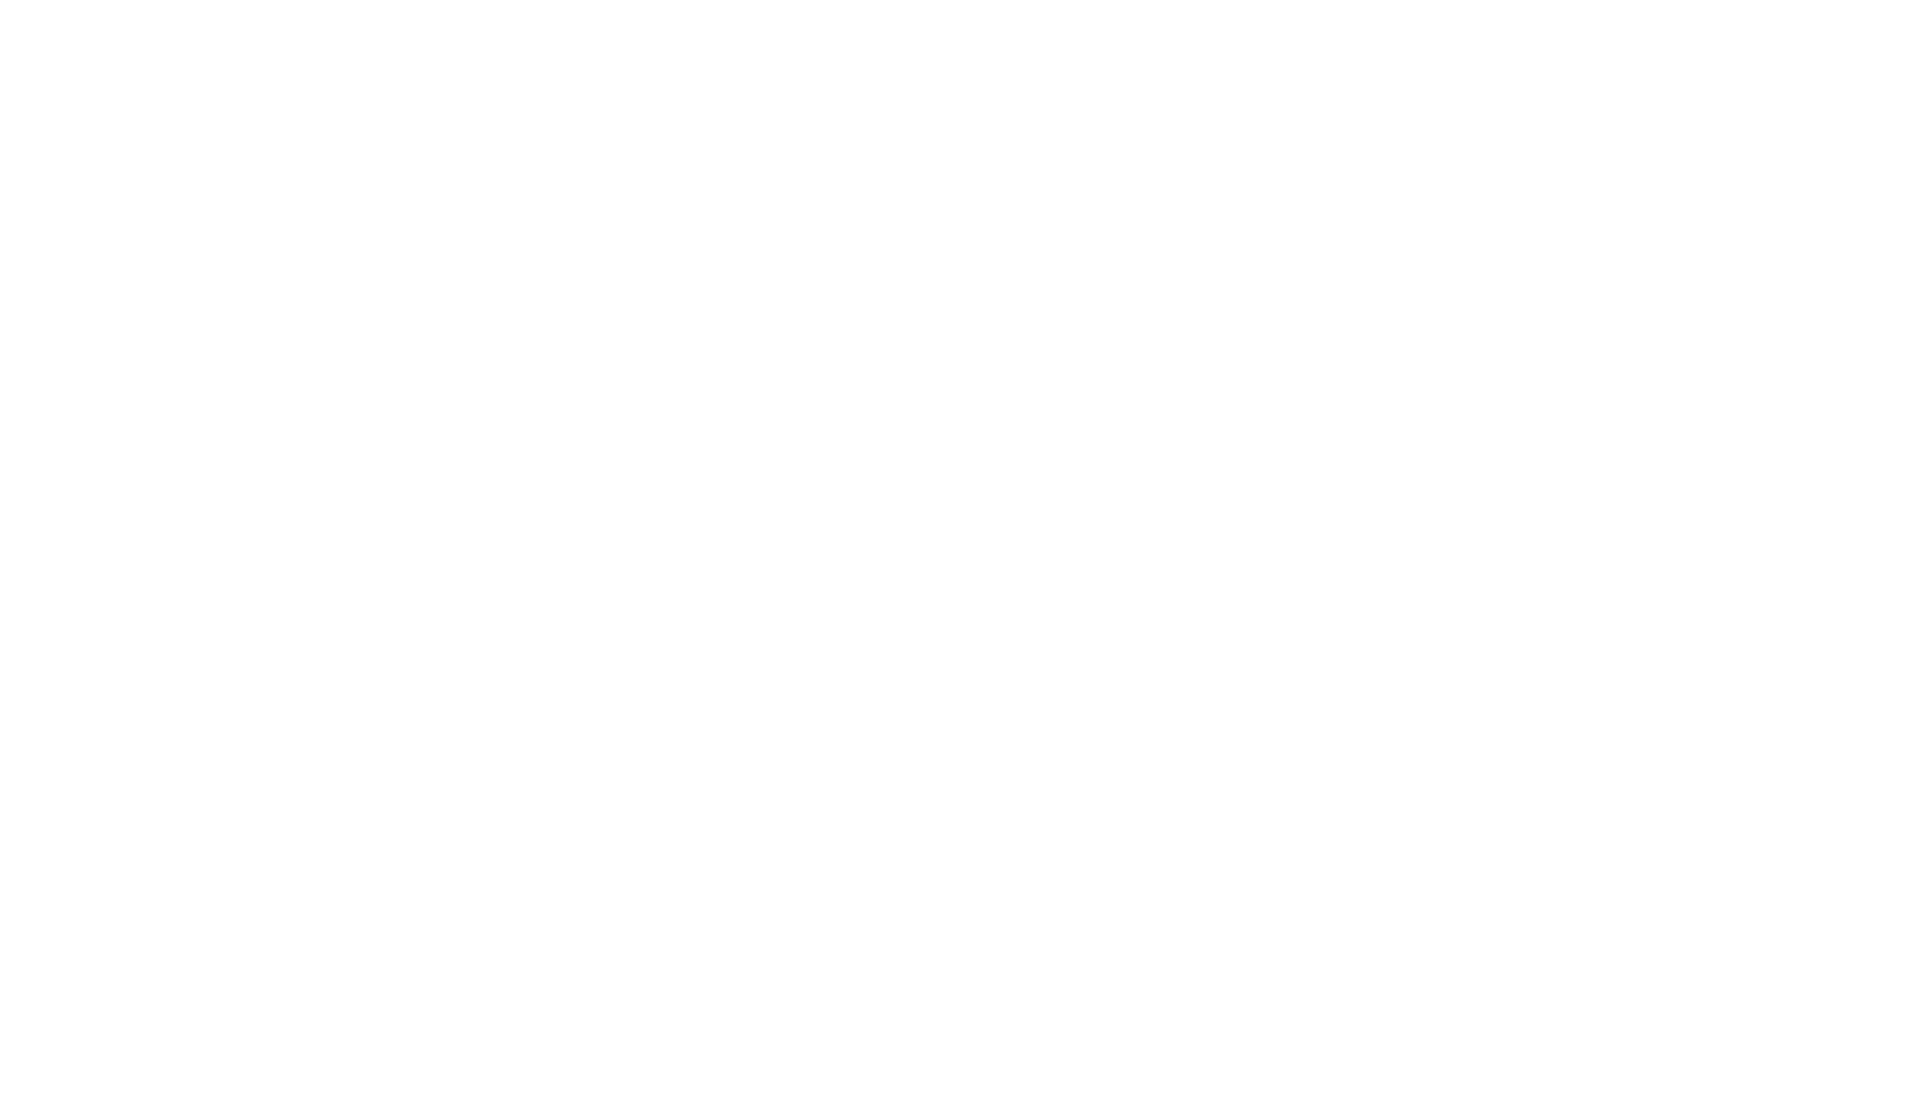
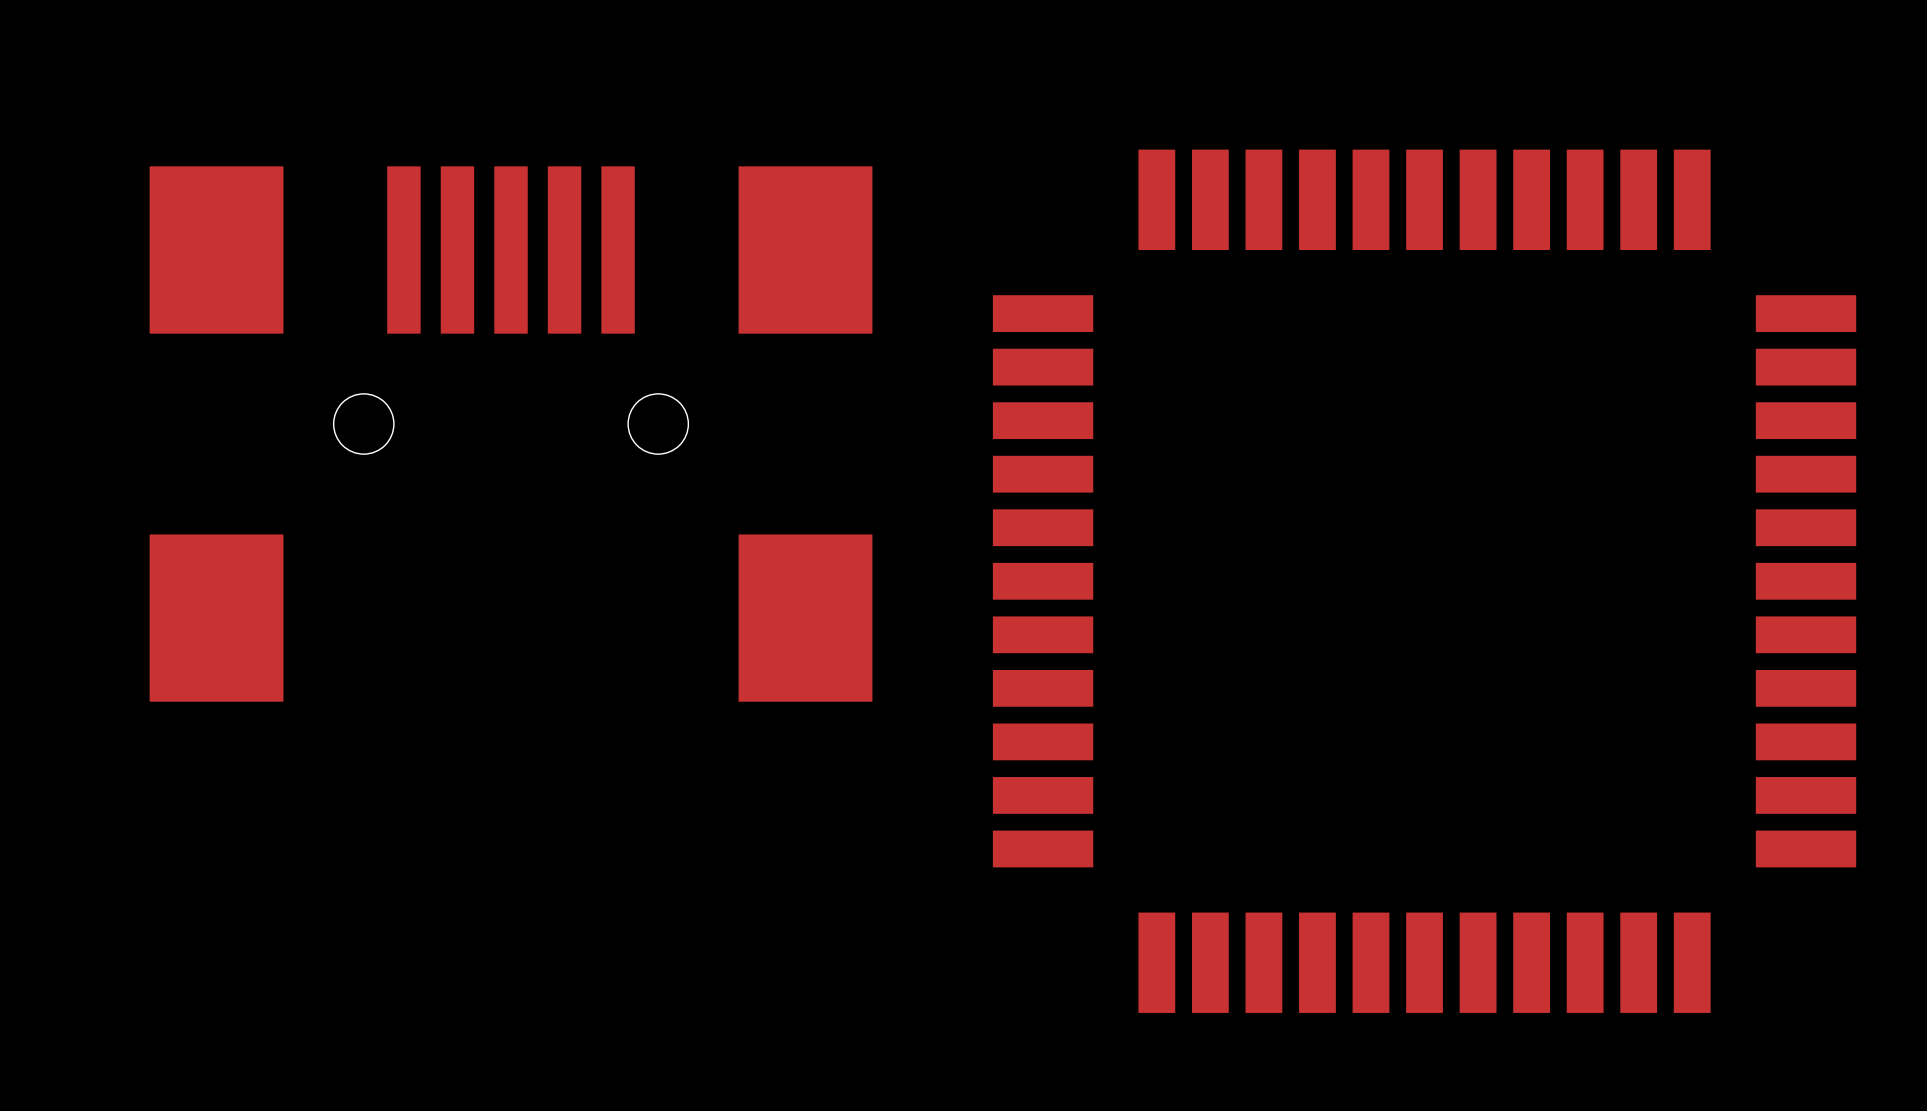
part: none -> (511, 434)
part: none -> (1424, 581)

